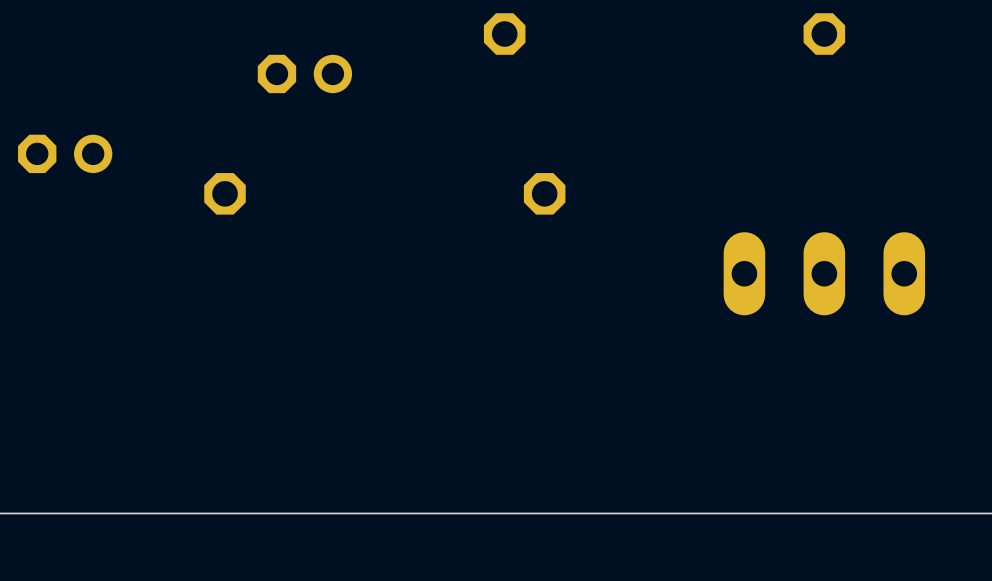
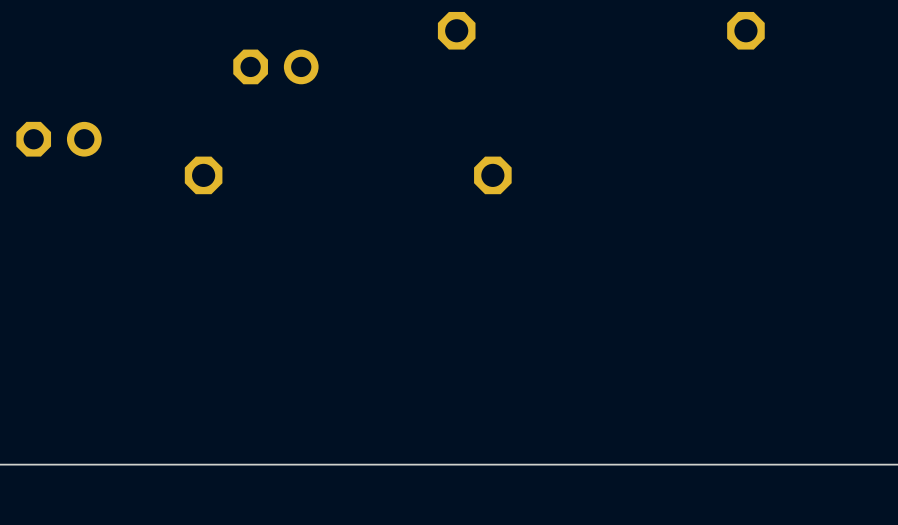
part: (824, 273) -> none

